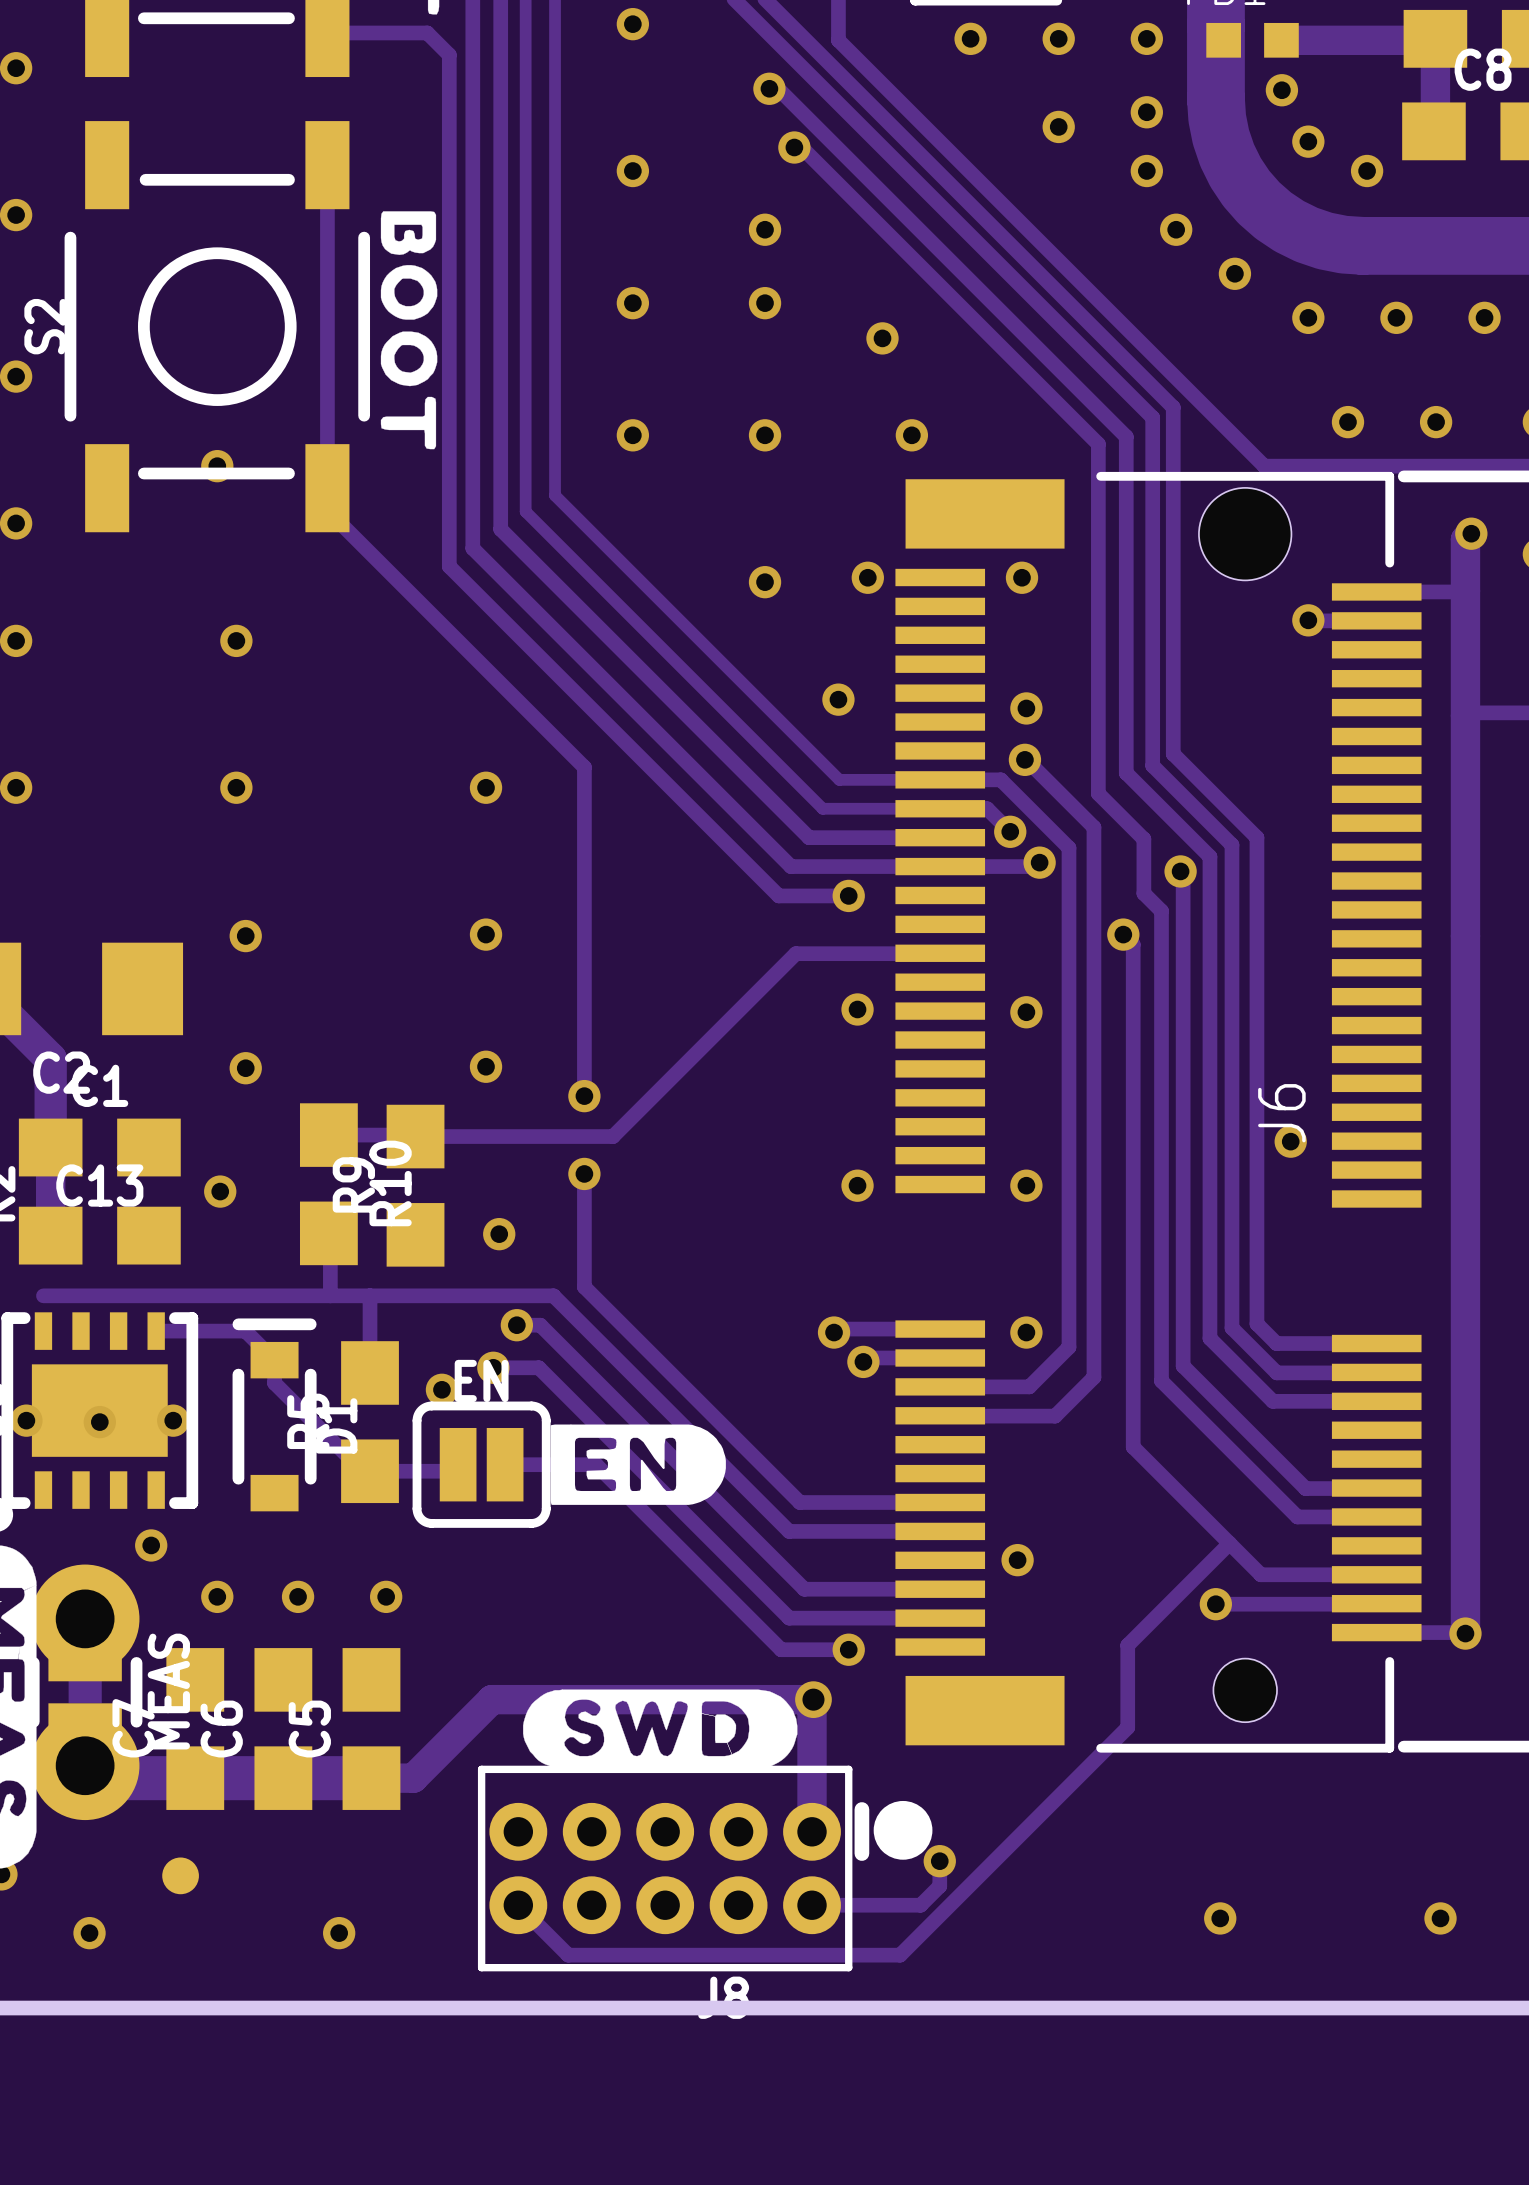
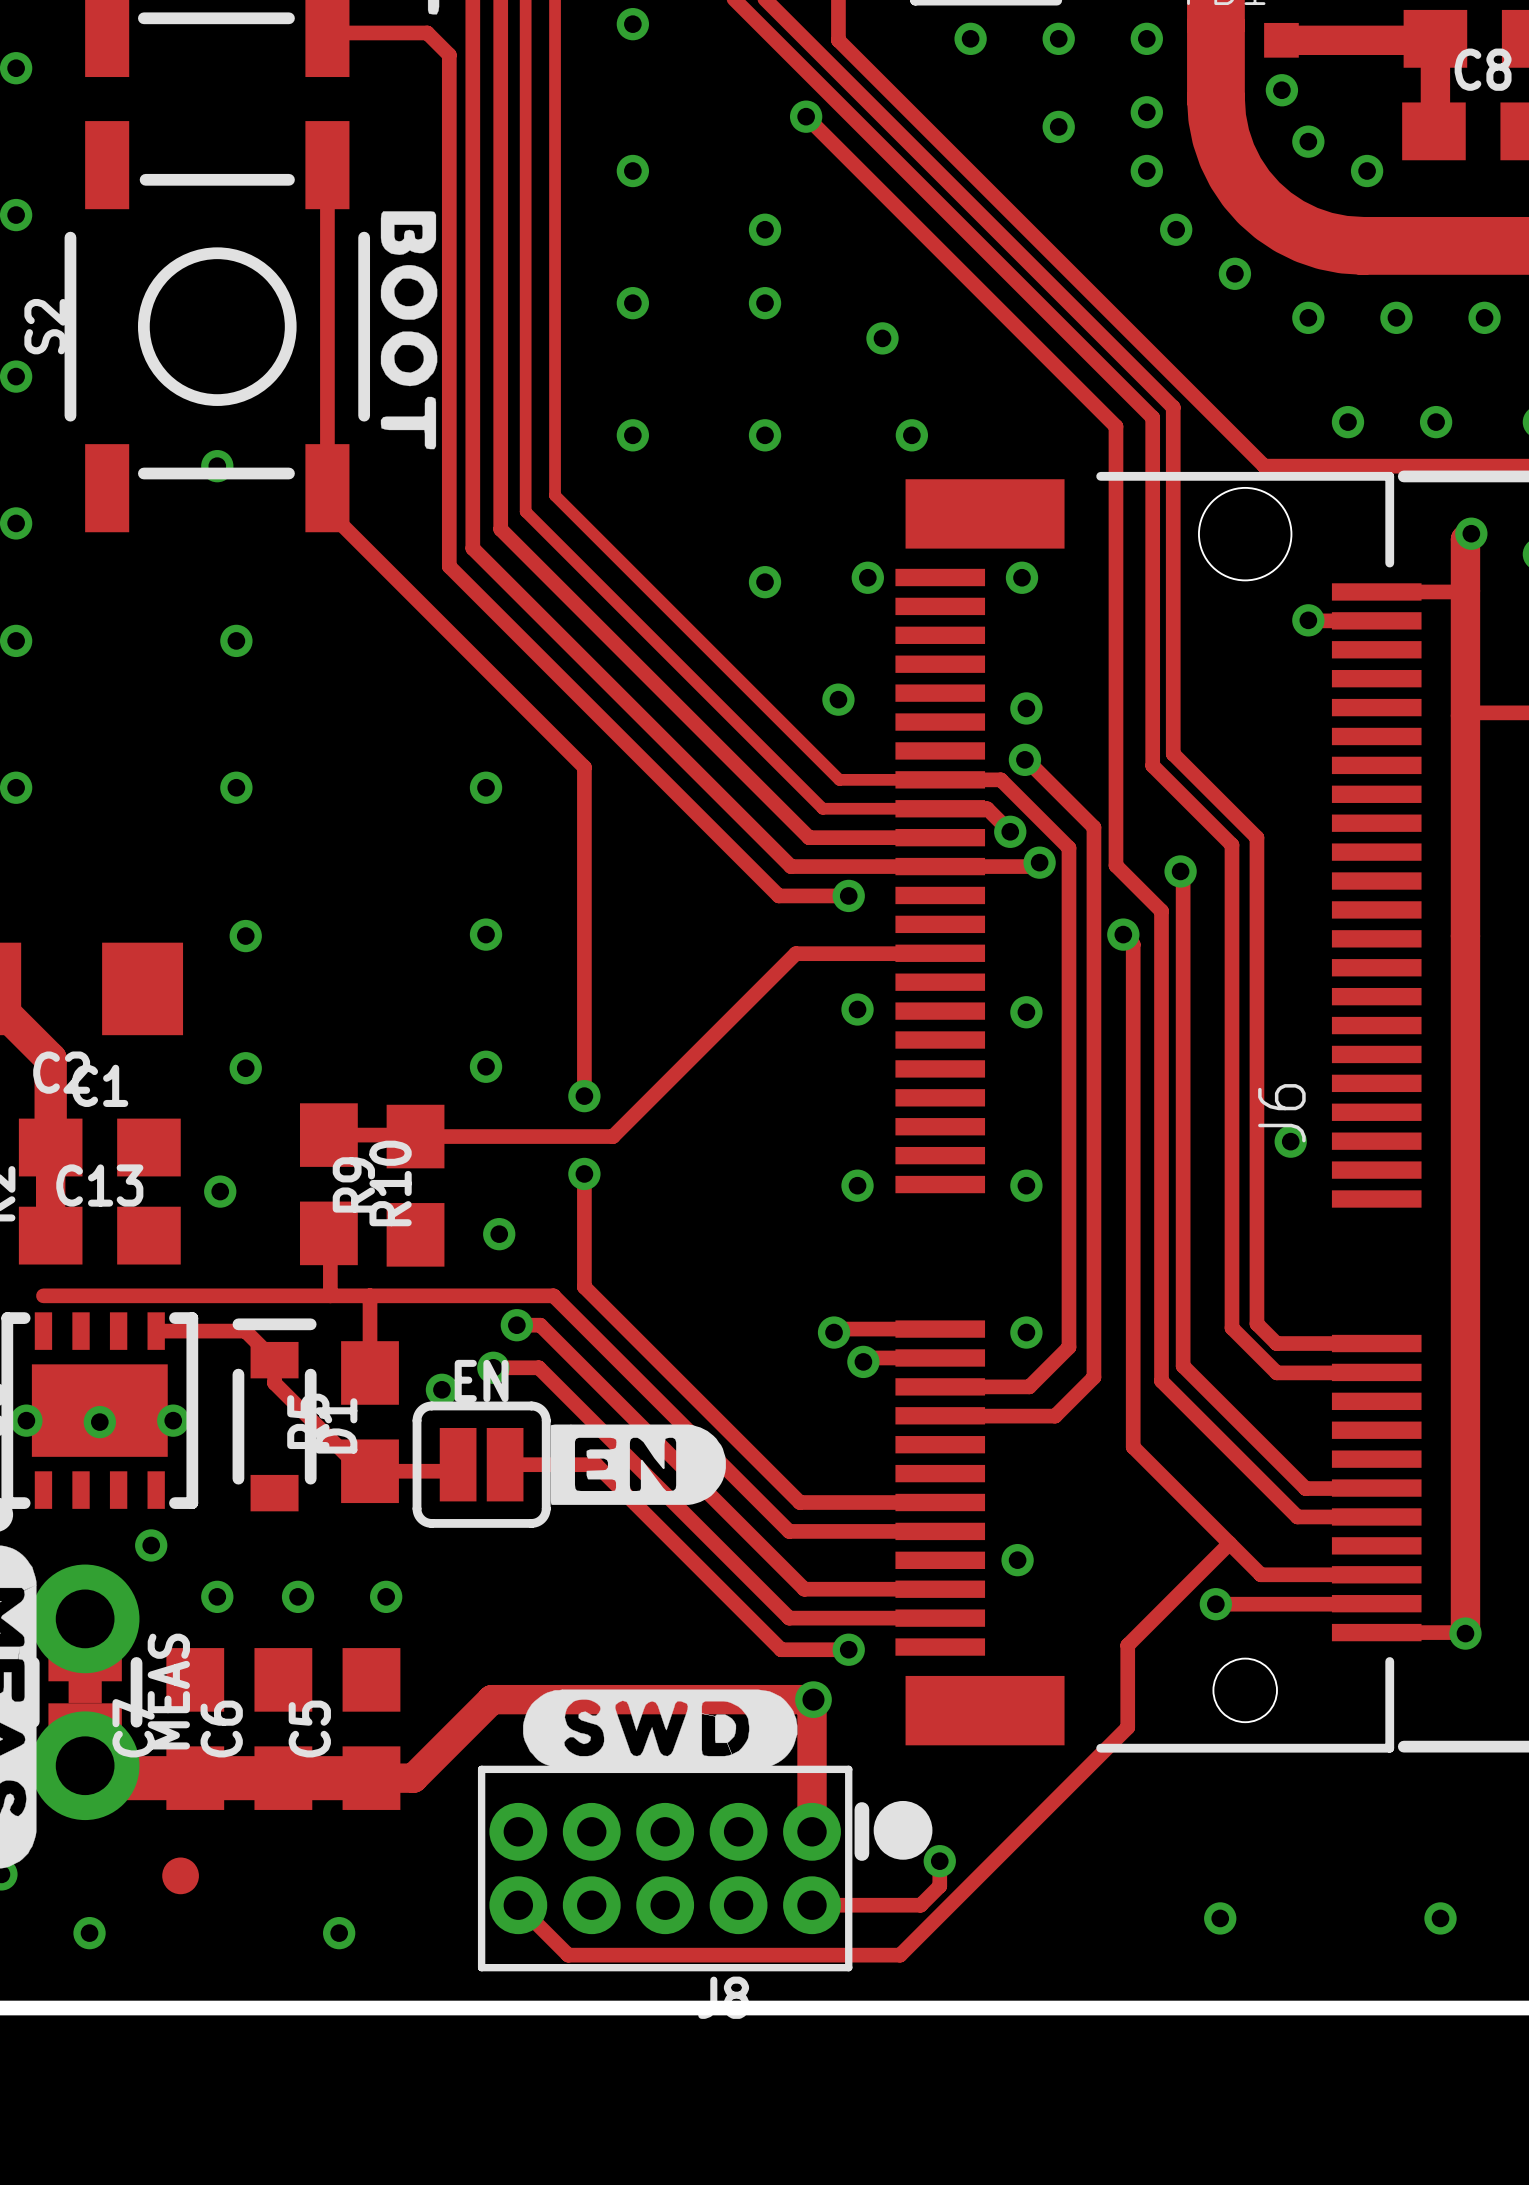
track: (769, 88) (778, 88) (806, 116) -> none
via: (769, 88) -> none
track: (794, 147) (801, 147) (1098, 444) (1098, 793) (1143, 839) (1143, 893) -> (1115, 426) (1115, 865) (1143, 893)
via position: (794, 147) -> (806, 116)
track: (1115, 426) (1126, 436) (1126, 773) (1209, 856) (1209, 1338) (1272, 1401) (1376, 1401) -> none

